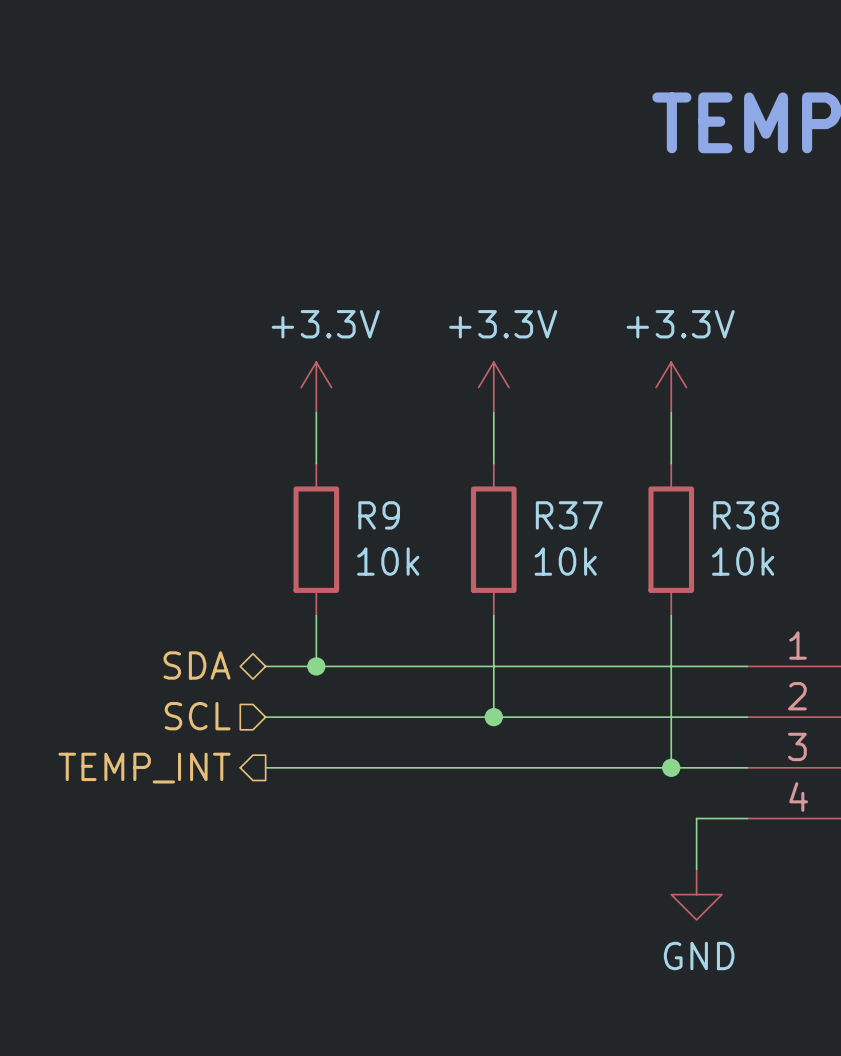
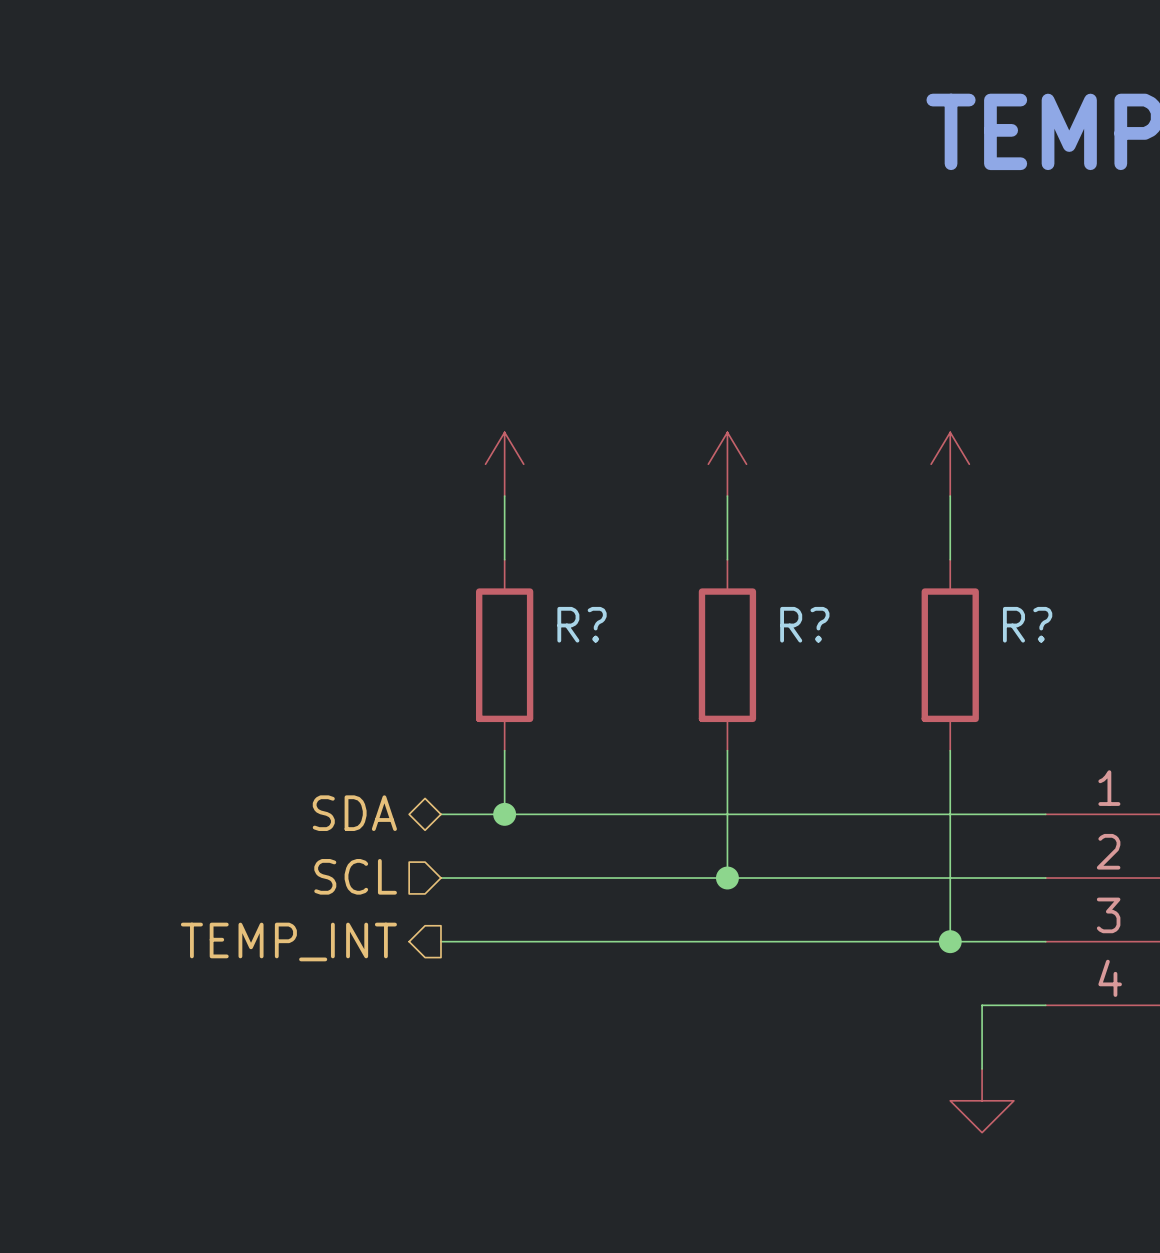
power symbol text: +3.3V (325, 324) -> none
power symbol text: +3.3V (503, 324) -> none
power symbol text: +3.3V (680, 324) -> none
R9 name: R9 (379, 515) -> R? (582, 624)
R37 name: R37 (569, 515) -> R? (804, 624)
R38 name: R38 (746, 515) -> R? (1027, 624)
R9 value: 10k (388, 561) -> none
R37 value: 10k (565, 561) -> none
R38 value: 10k (743, 561) -> none
power symbol text: GND (699, 956) -> none

